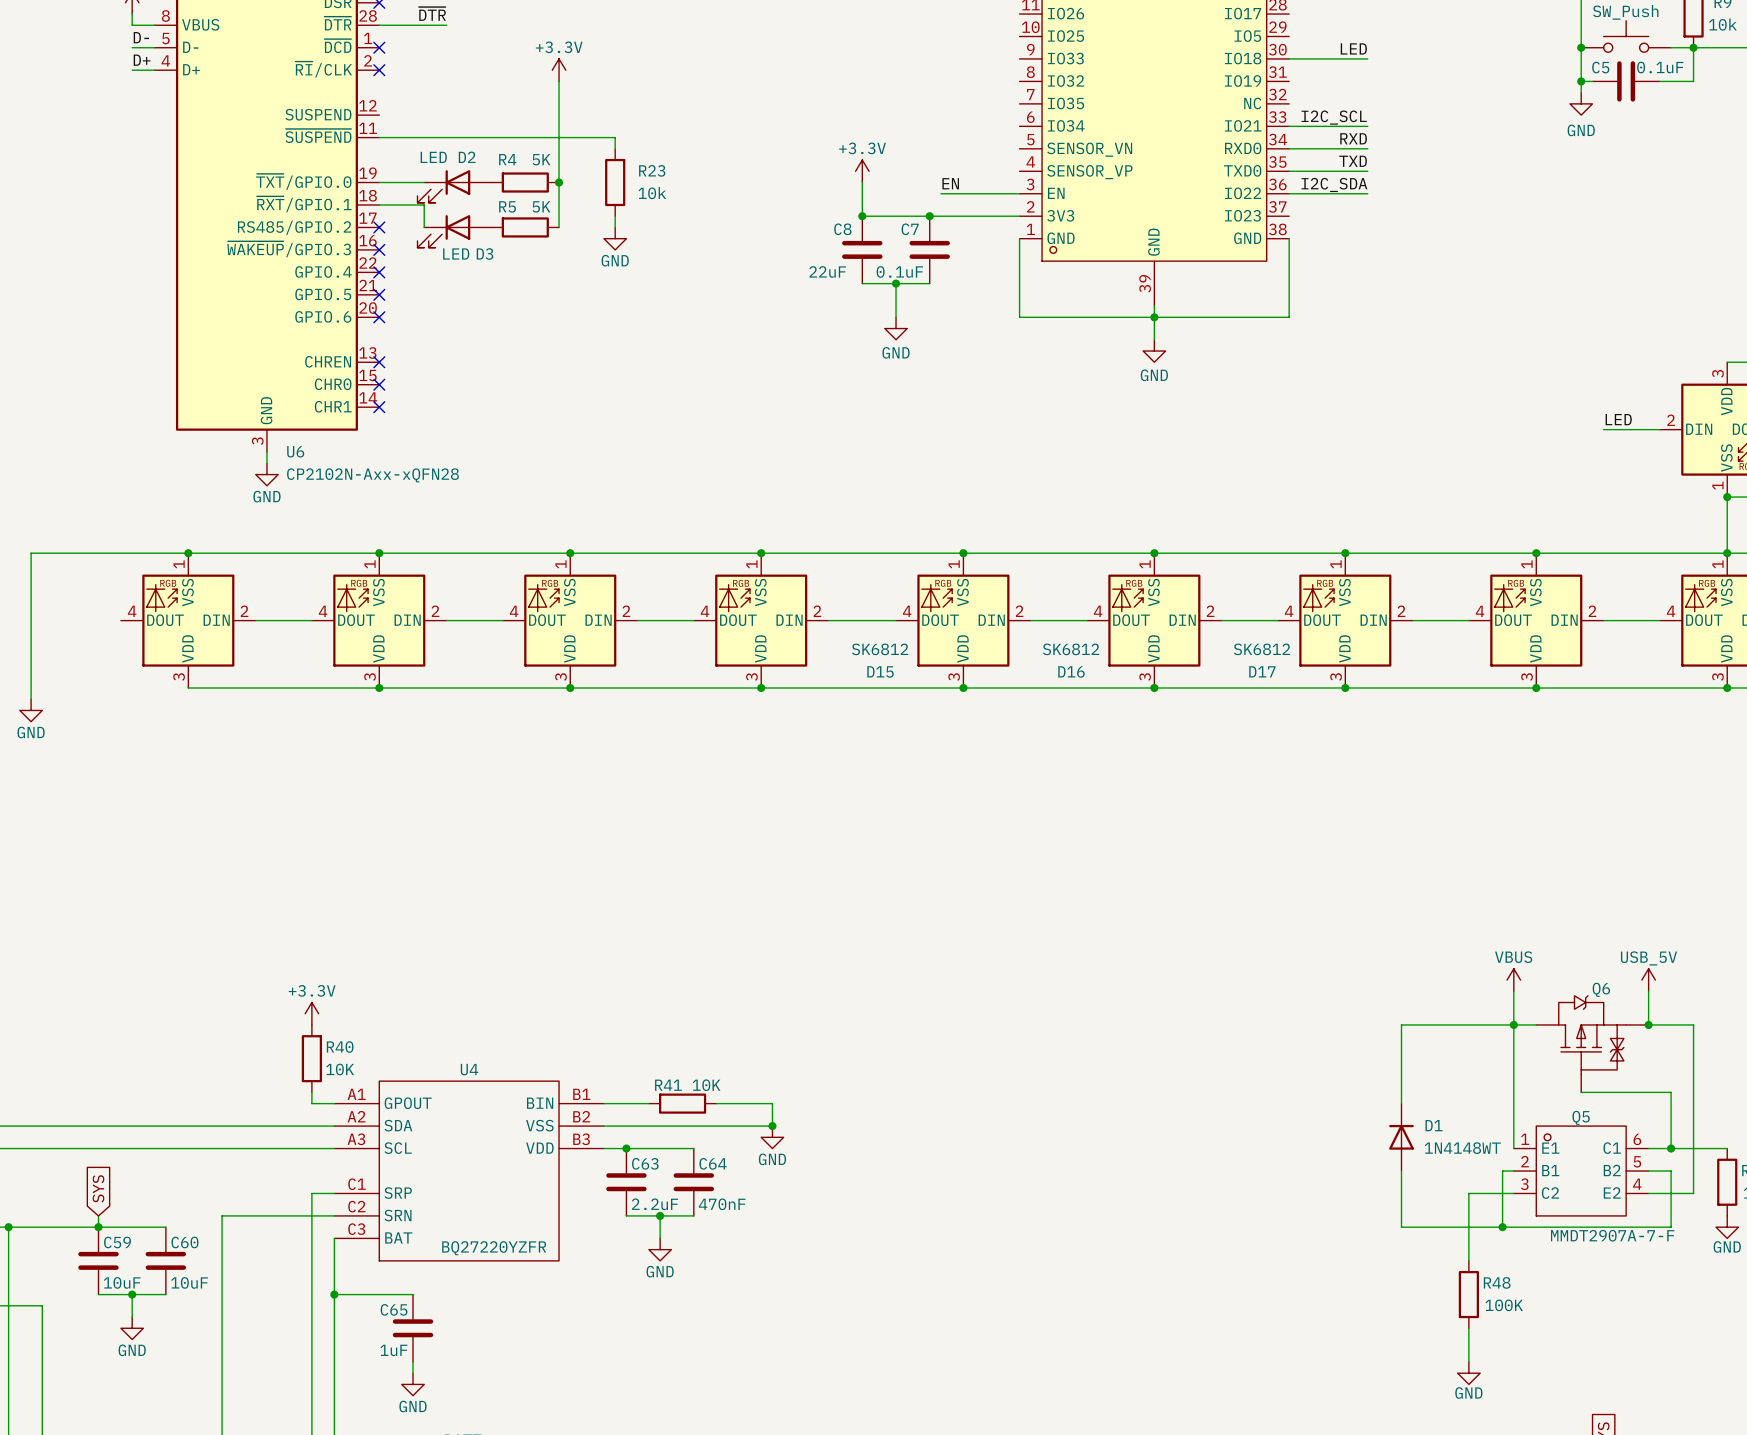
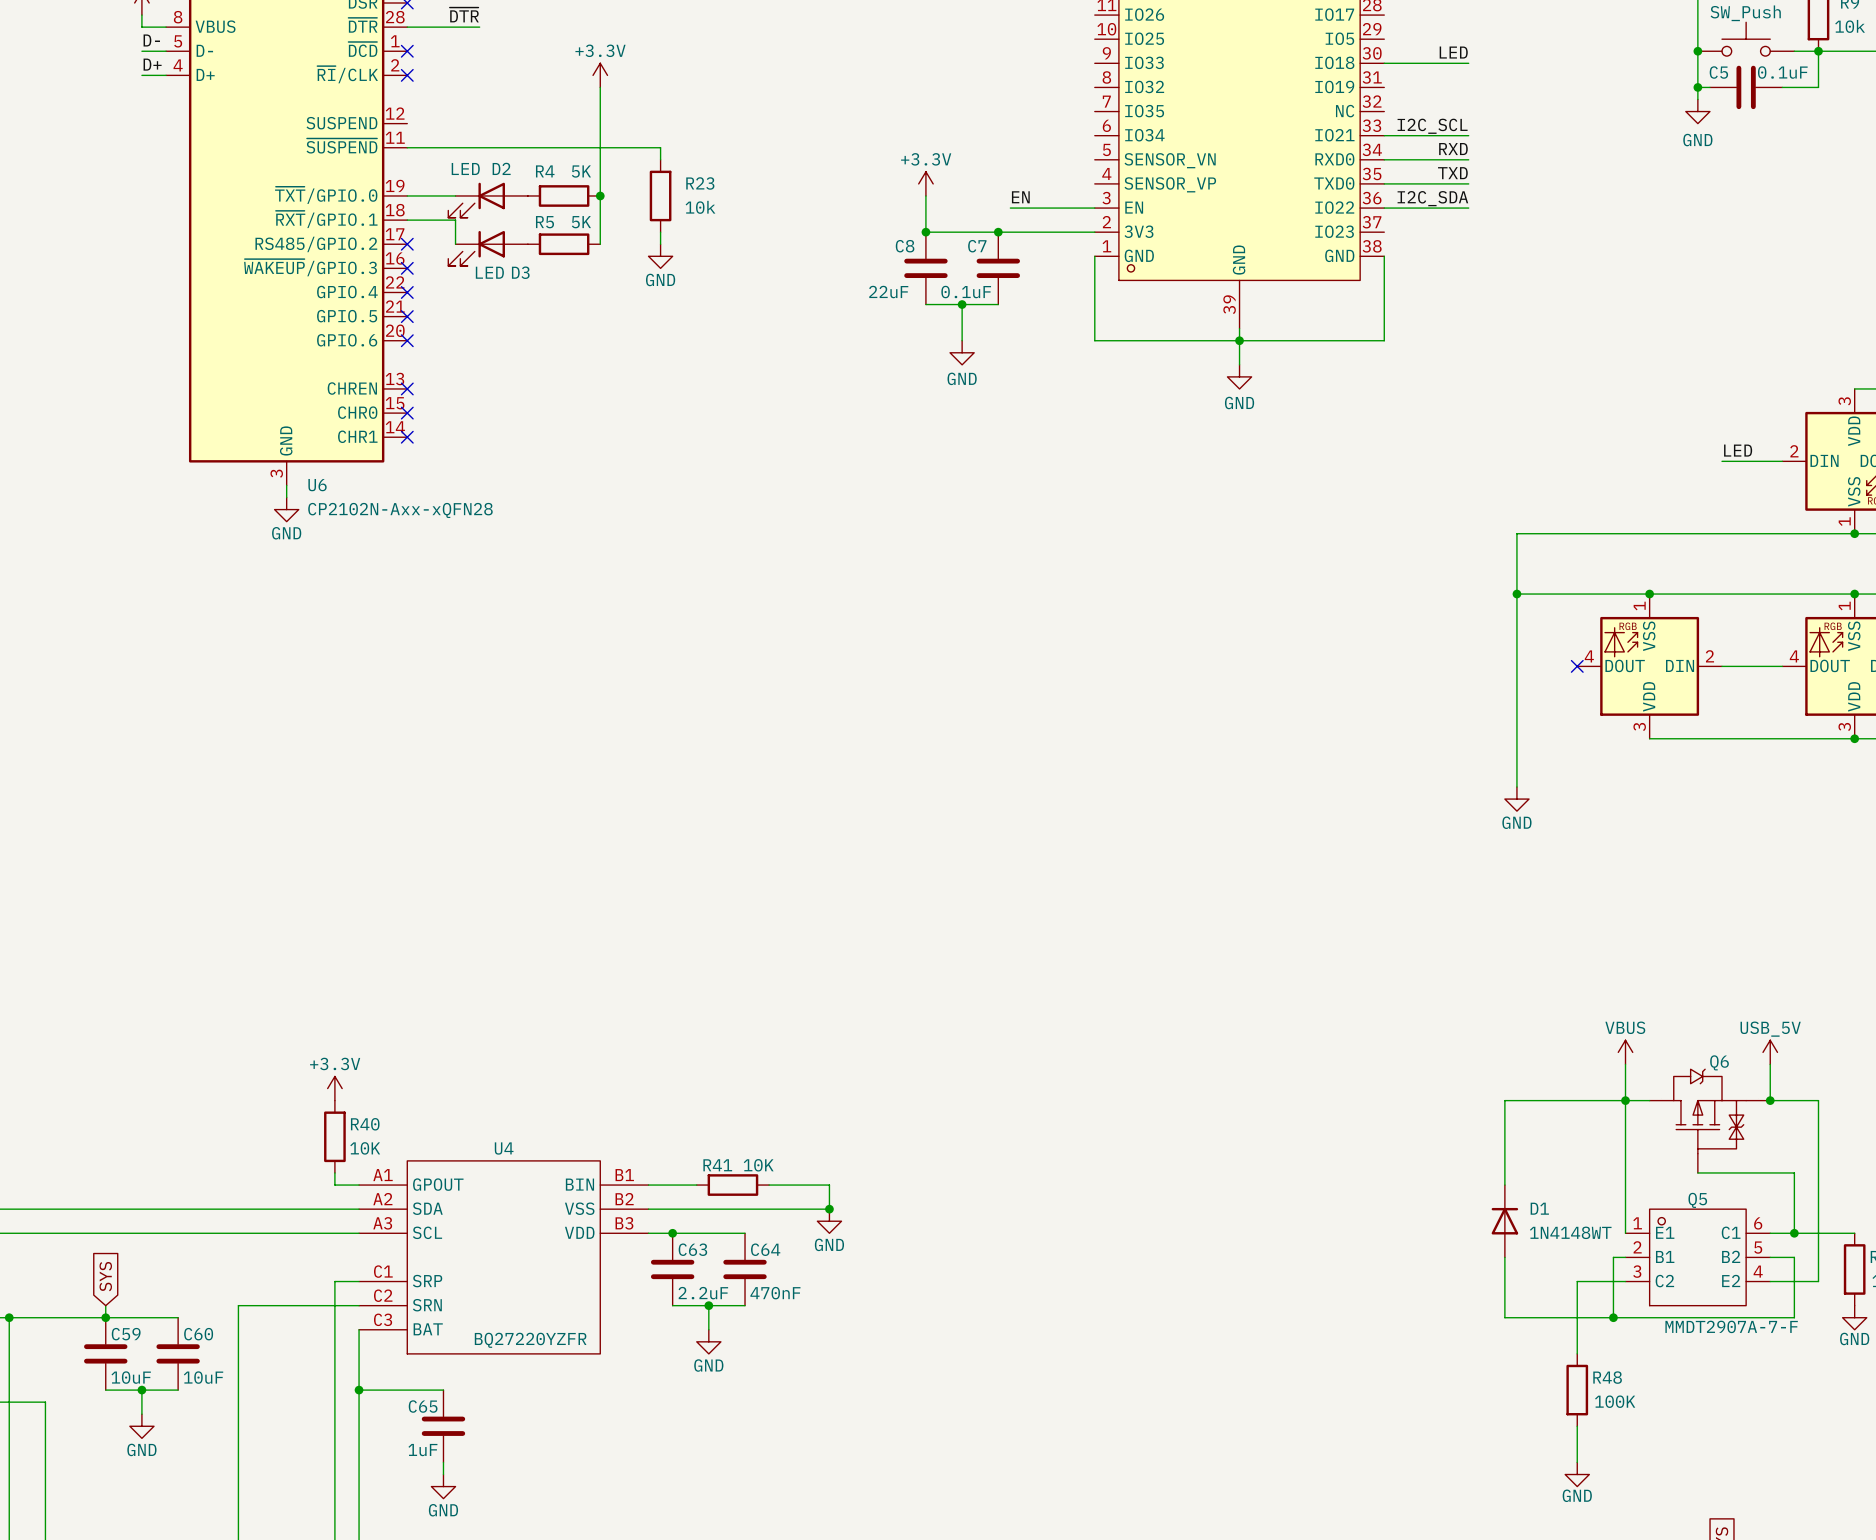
wire: (1727, 497) (1727, 553) -> (1854, 533) (1516, 533) (1516, 787)
junction: (188, 553) -> none
junction: (379, 553) -> none
junction: (570, 553) -> none
junction: (761, 553) -> none
junction: (963, 553) -> none
junction: (1154, 553) -> none
junction: (1345, 553) -> none
wire: (1412, 553) (31, 553) (31, 699) -> none
junction: none -> (1516, 594)
part: (188, 620) -> none
wire: (255, 620) (311, 620) -> none
part: (379, 620) -> none
wire: (446, 620) (502, 620) -> none
part: (570, 620) -> none
wire: (637, 620) (693, 620) -> none
part: (761, 620) -> none
wire: (828, 620) (896, 620) -> none
D15: SK6812 (963, 620) -> none
wire: (1030, 620) (1086, 620) -> none
D16: SK6812 (1154, 620) -> none
wire: (1221, 620) (1277, 620) -> none
D17: SK6812 (1345, 620) -> none
wire: (1412, 620) (1468, 620) -> none
no-connect mark: none -> (1577, 666)
wire: (188, 688) (1536, 688) -> none
junction: (379, 688) -> none
junction: (570, 688) -> none
junction: (761, 688) -> none
junction: (963, 688) -> none
junction: (1154, 688) -> none
junction: (1345, 688) -> none
junction: (1536, 688) -> none
power symbol: GND (31, 710) -> none
power symbol: none -> GND (1516, 799)

